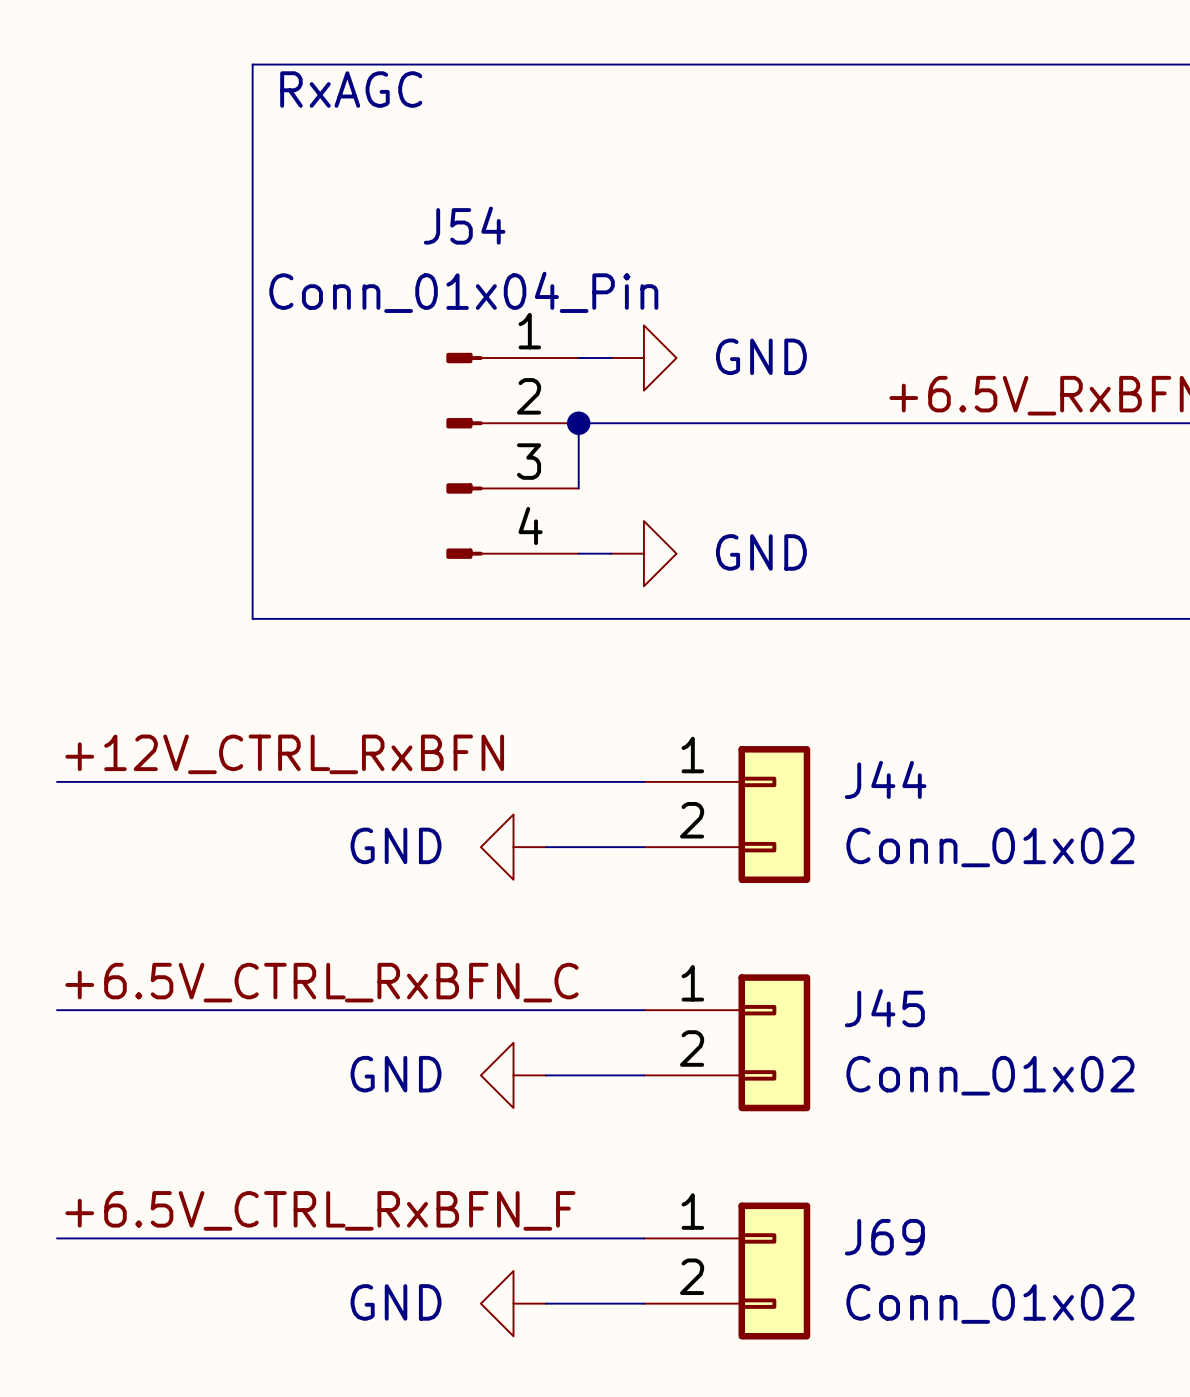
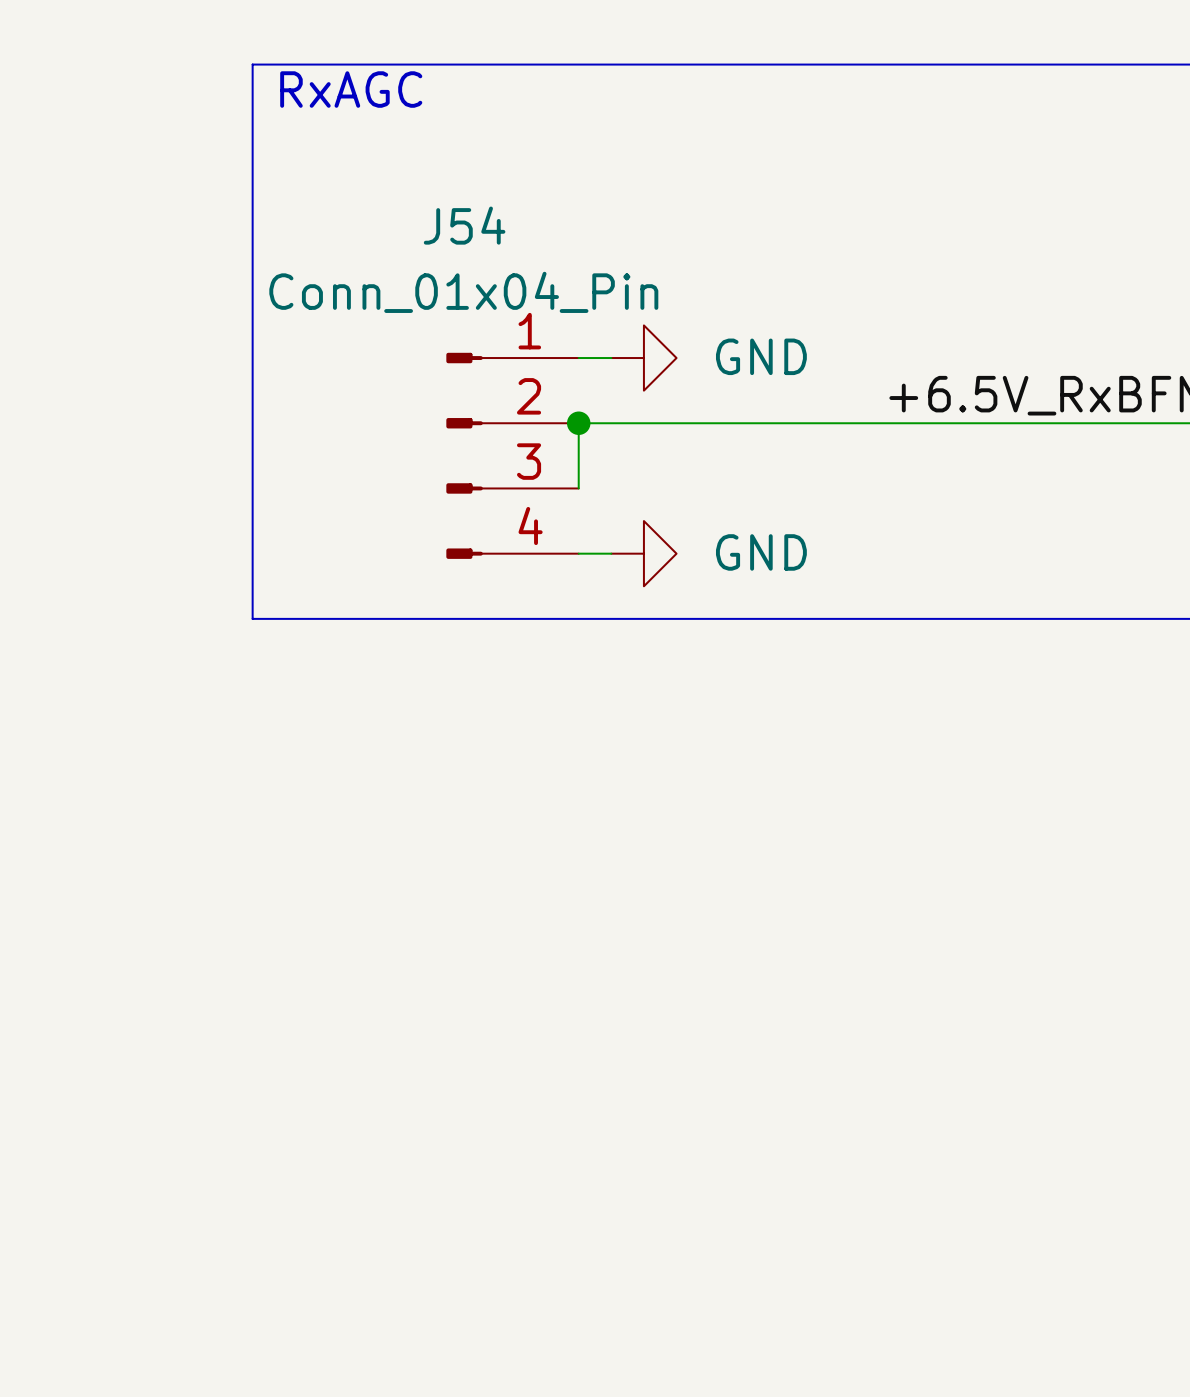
label: +12V_CTRL_RxBFN (284, 754) -> none
wire: (57, 781) (643, 781) -> none
J44: Conn_01x02 (727, 814) -> none
power symbol: GND (513, 847) -> none
wire: (546, 847) (643, 847) -> none
label: +6.5V_CTRL_RxBFN_C (321, 982) -> none
wire: (57, 1010) (643, 1010) -> none
J45: Conn_01x02 (727, 1042) -> none
power symbol: GND (513, 1075) -> none
wire: (546, 1075) (643, 1075) -> none
label: +6.5V_CTRL_RxBFN_F (320, 1210) -> none
wire: (57, 1238) (643, 1238) -> none
J69: Conn_01x02 (727, 1271) -> none
power symbol: GND (513, 1303) -> none
wire: (546, 1303) (643, 1303) -> none

